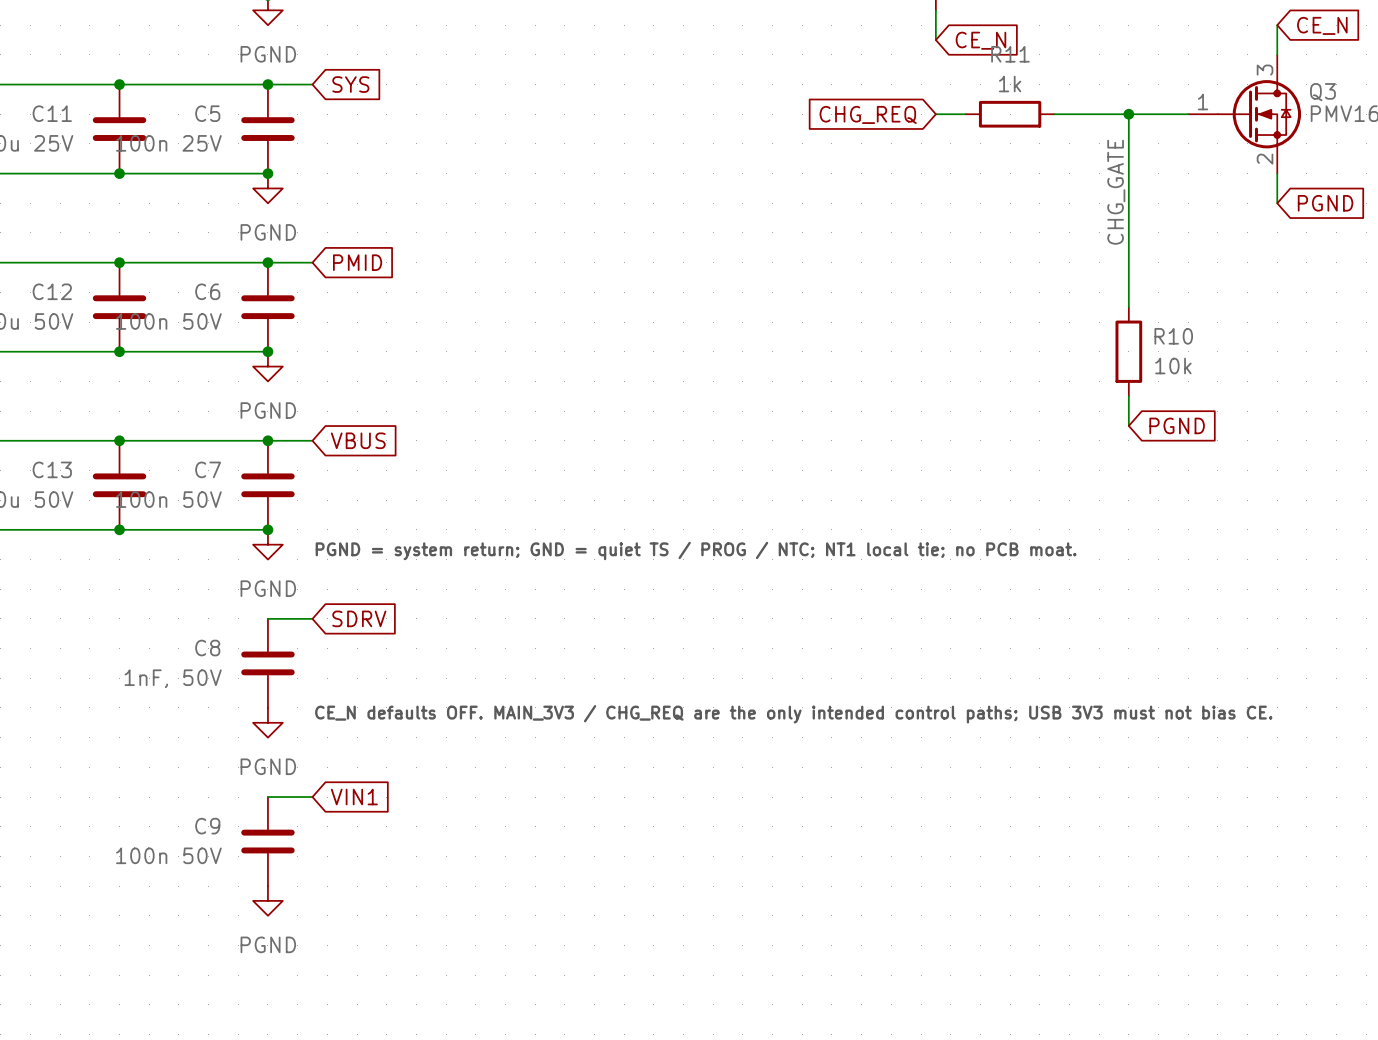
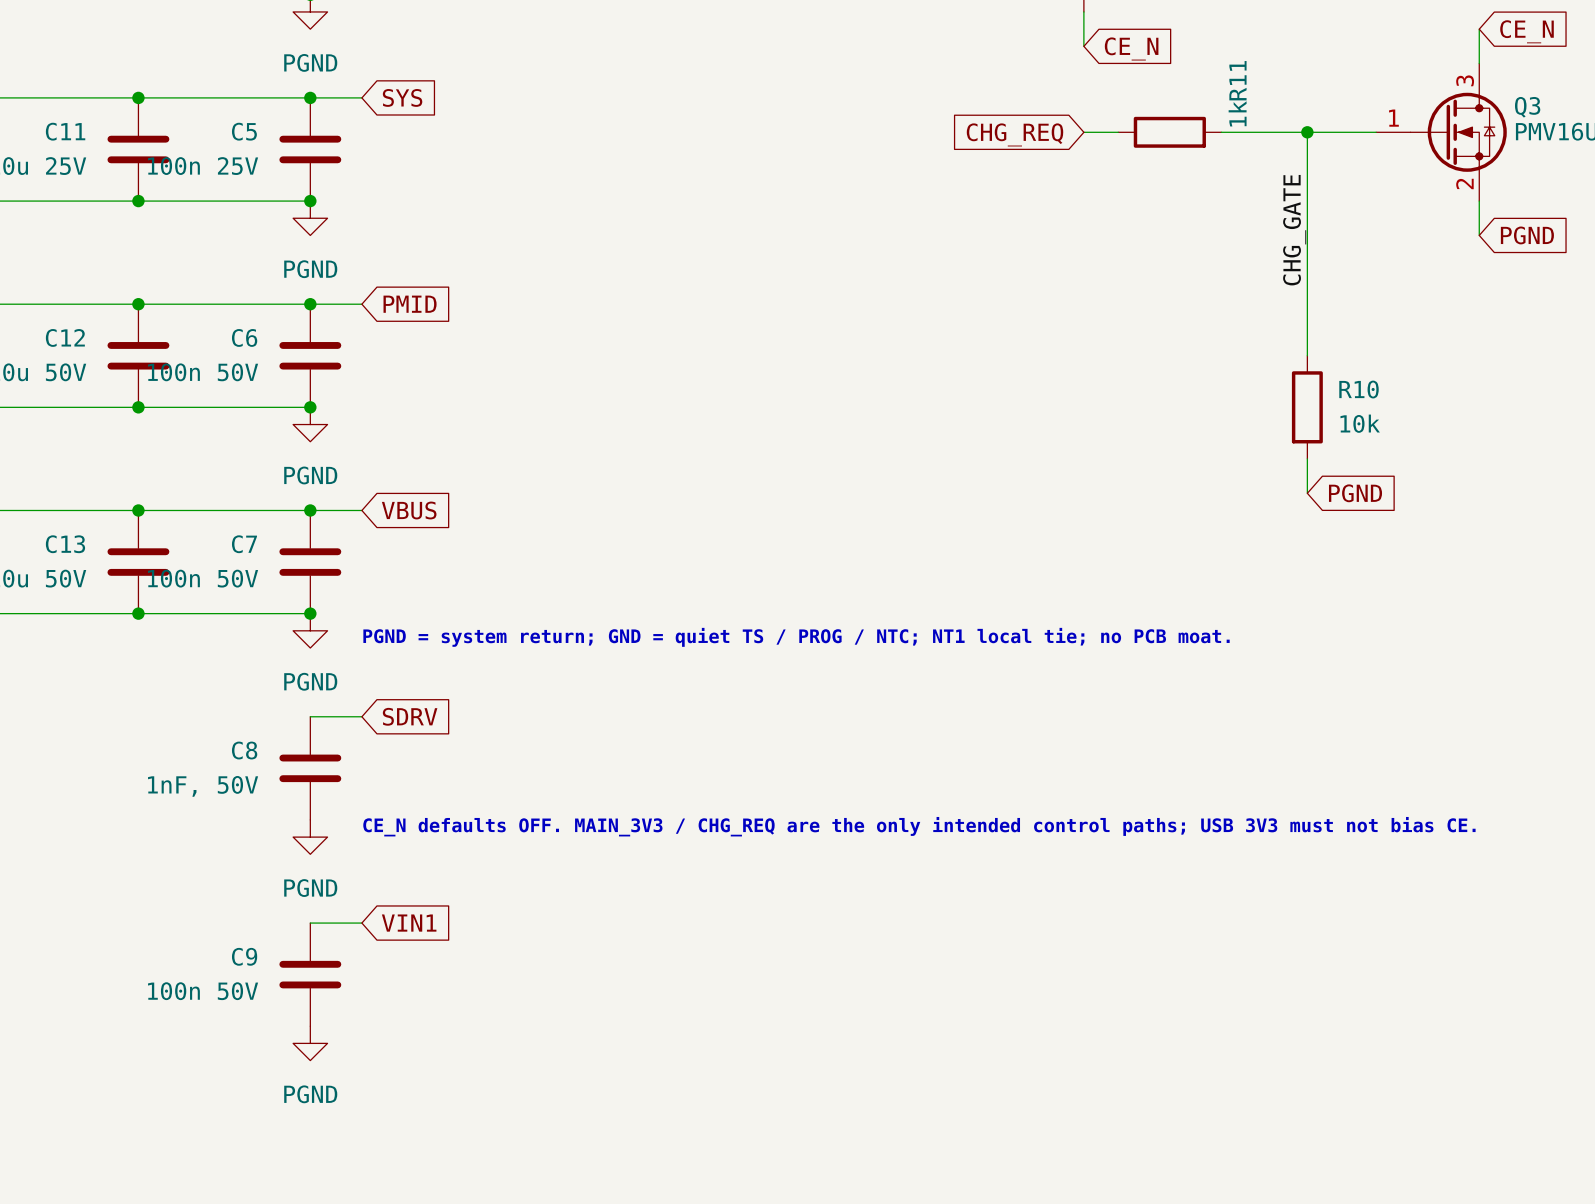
R11 name rotation: 0° (1010, 54) -> 90° counterclockwise (1237, 80)
R11 name position: R11 (1010, 54) -> R11 (1237, 80)
R11 value rotation: 0° (1010, 83) -> 90° counterclockwise (1237, 113)
R11 value position: 1k (1010, 83) -> 1k (1237, 113)

